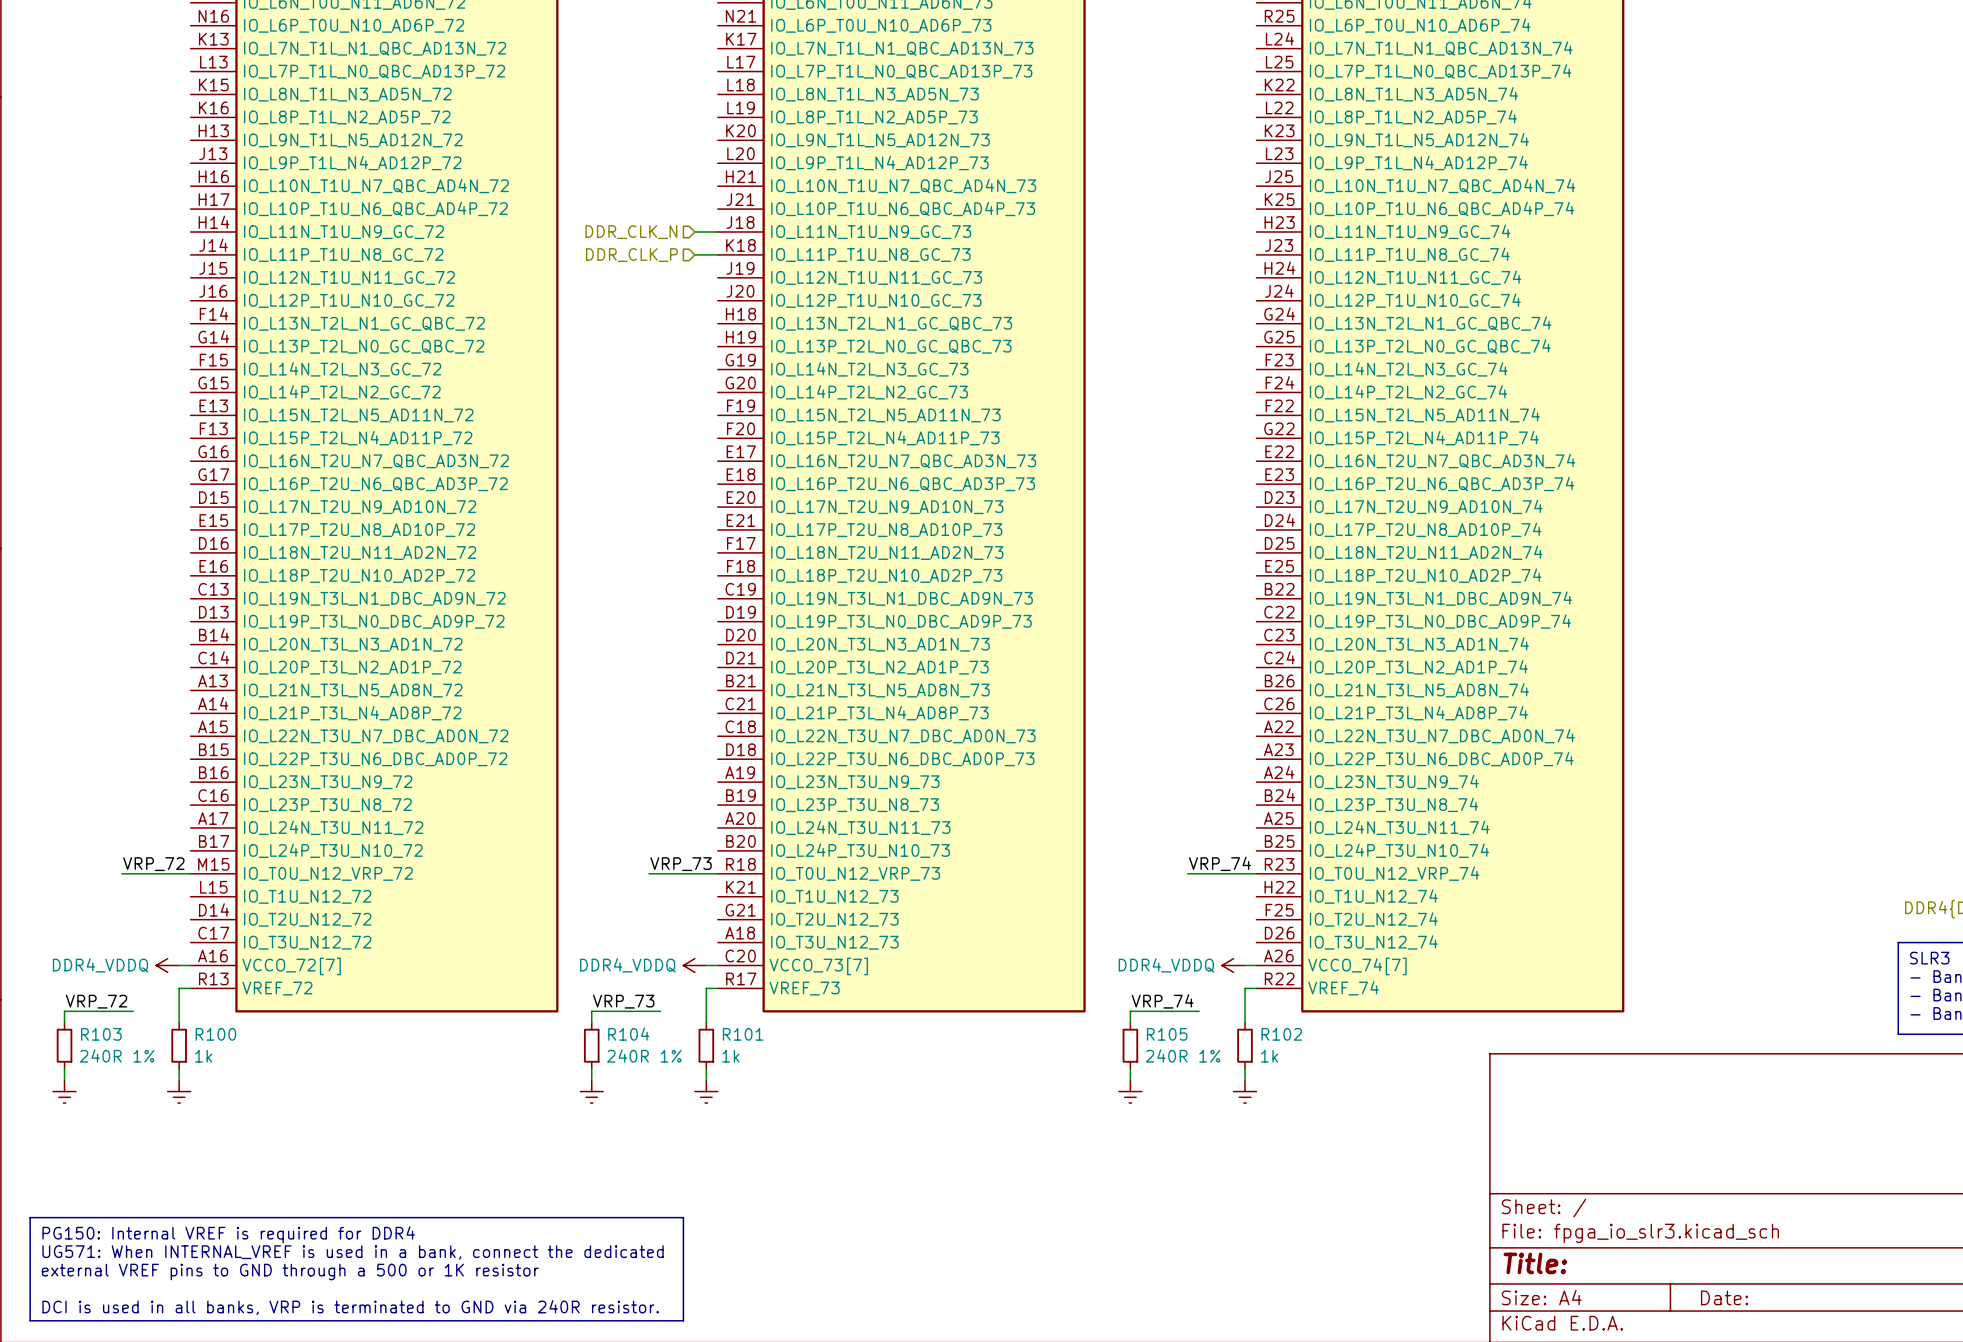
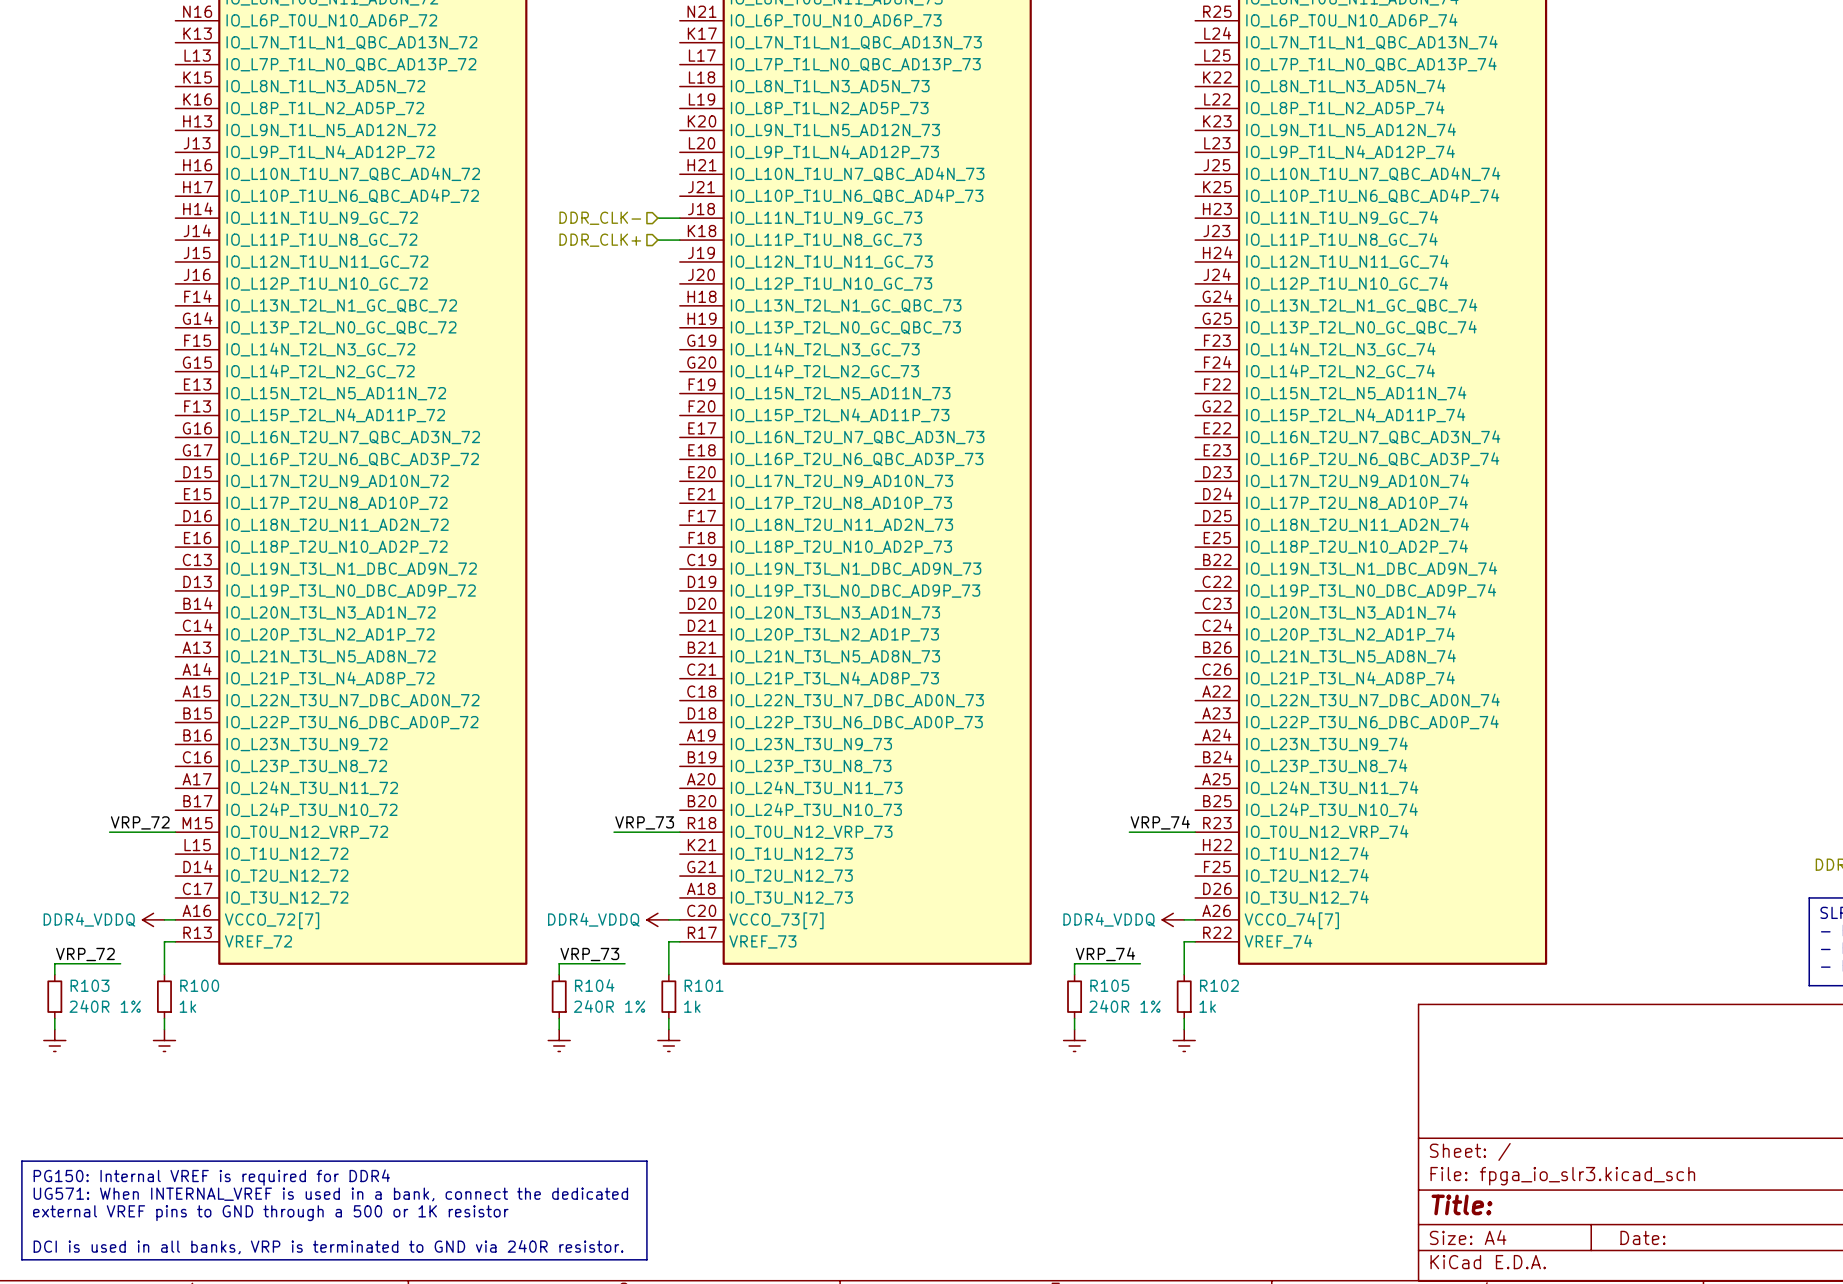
hierarchical label: DDR_CLK_N (631, 232) -> DDR_CLK- (600, 218)
hierarchical label: DDR_CLK_P (631, 255) -> DDR_CLK+ (600, 240)

